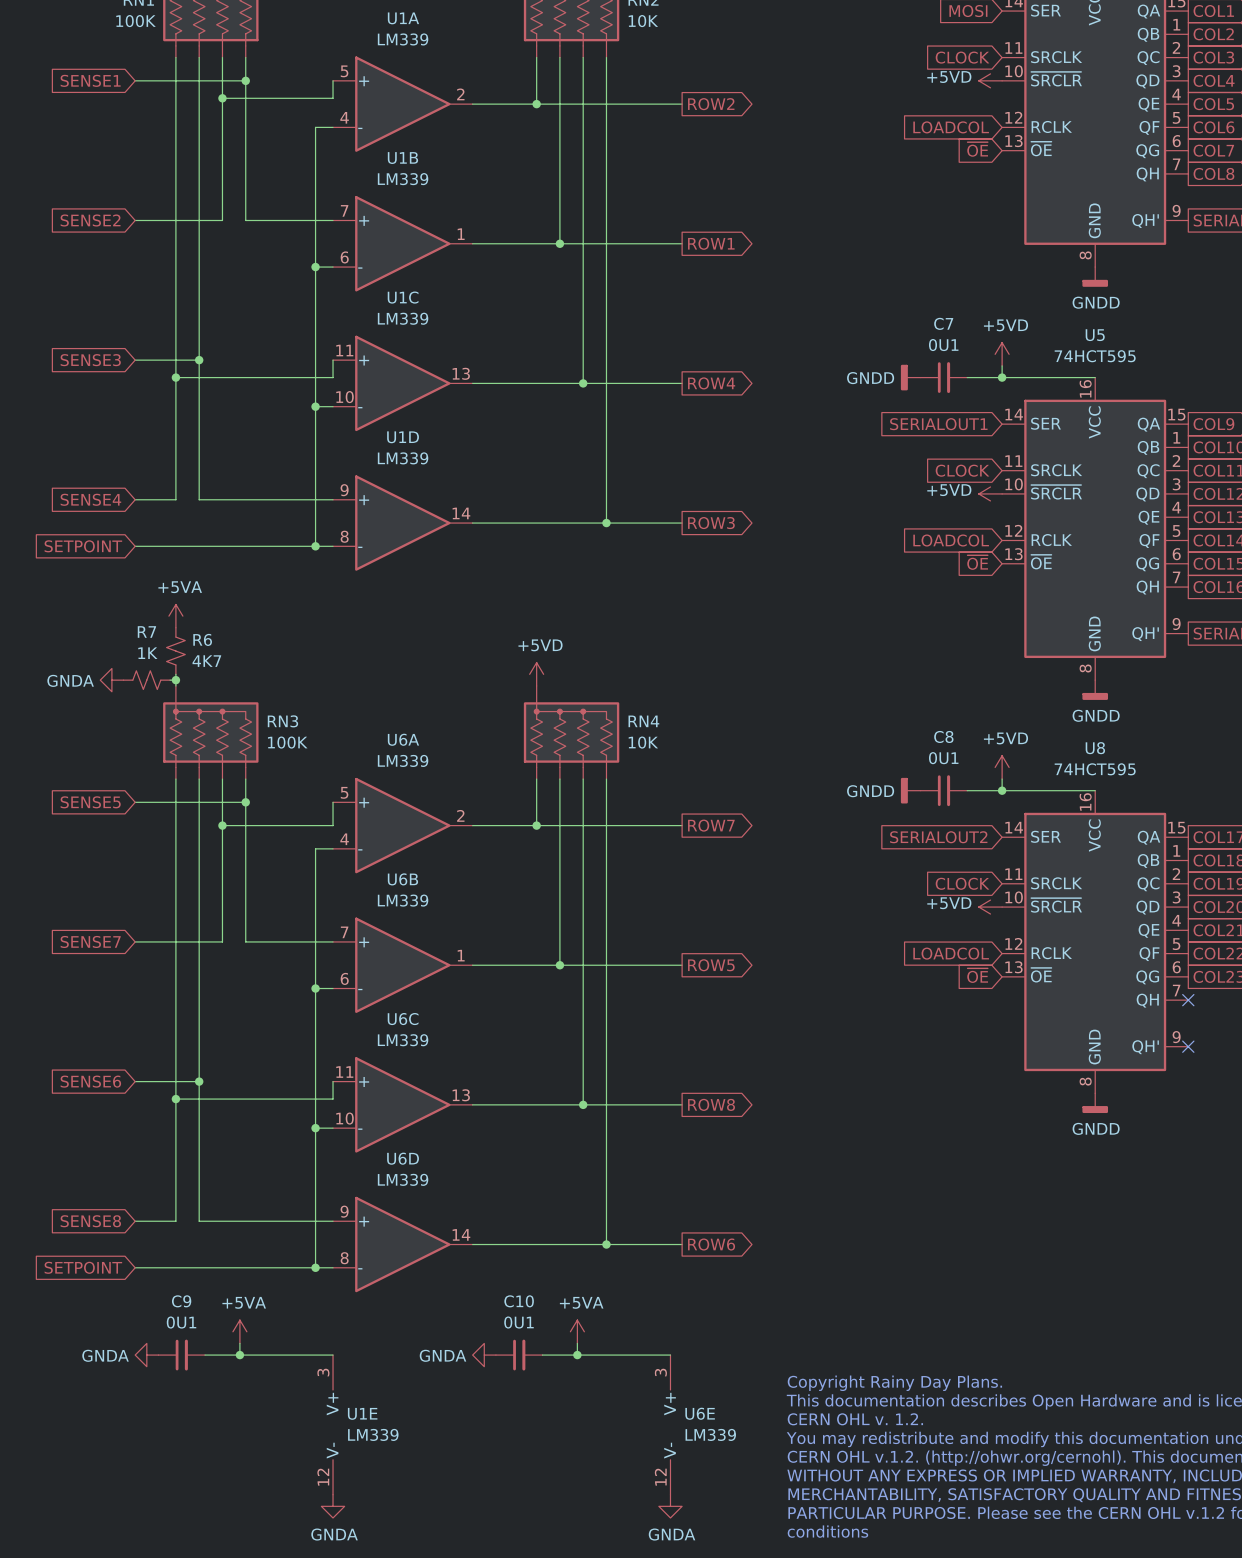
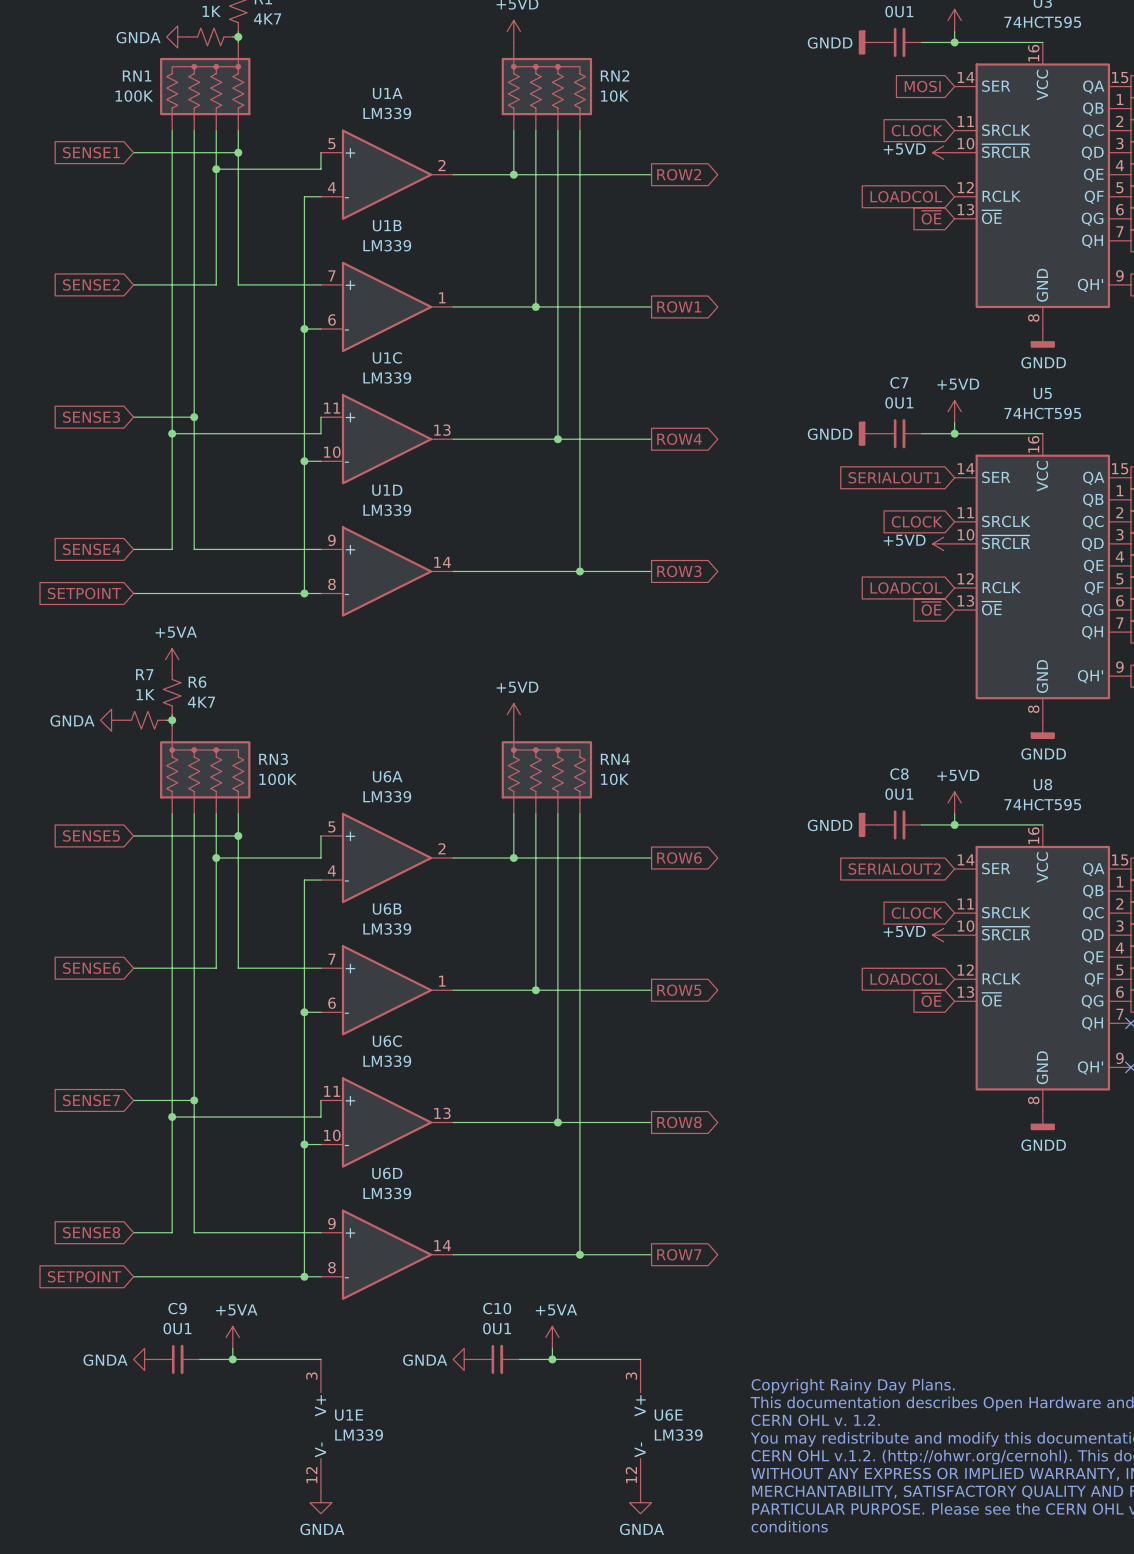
global label: ROW7 (711, 825) -> ROW6 (679, 858)
global label: SENSE7 (90, 941) -> SENSE6 (91, 968)
global label: SENSE6 (90, 1081) -> SENSE7 (91, 1100)
global label: ROW6 (711, 1244) -> ROW7 (679, 1254)

